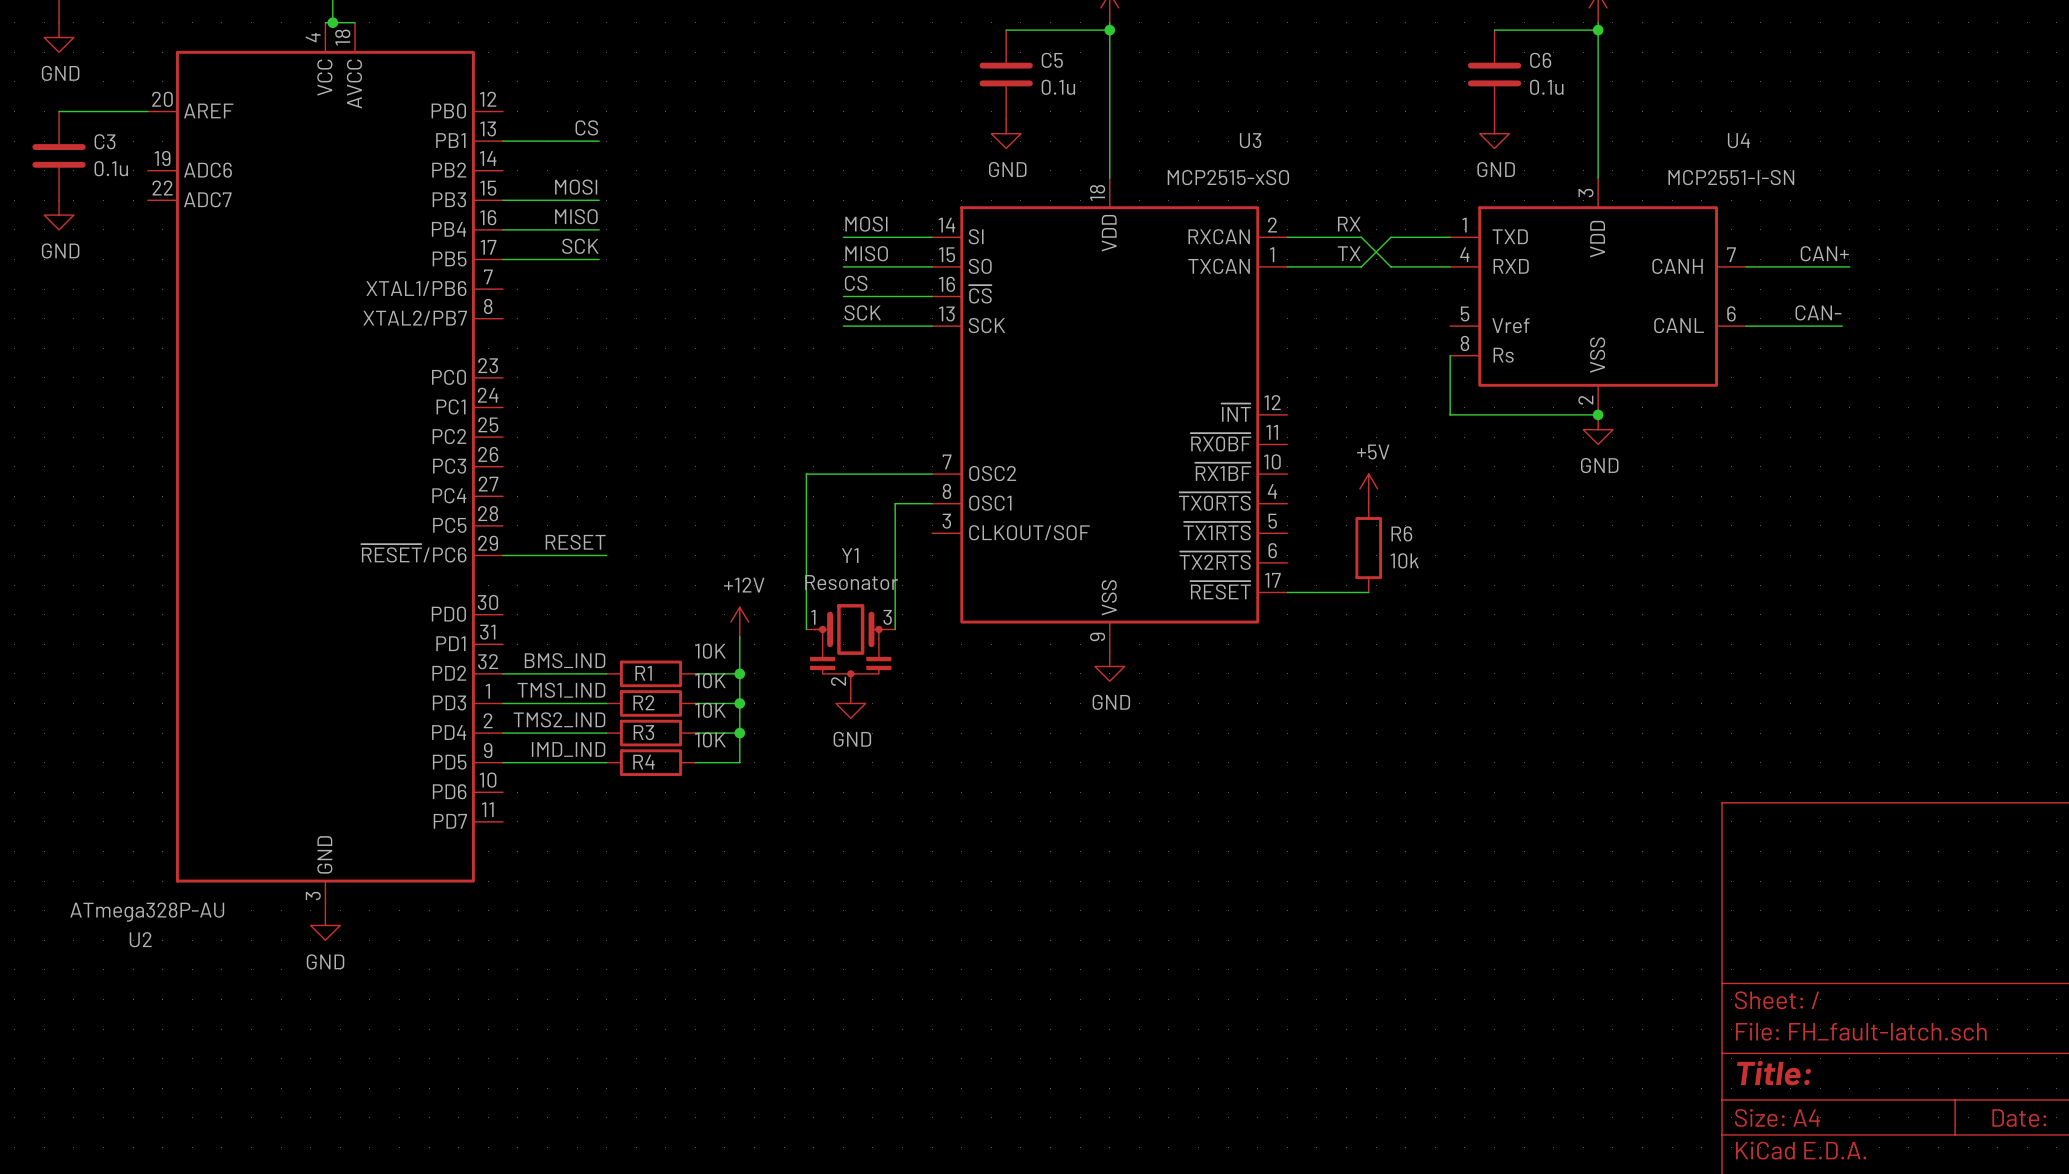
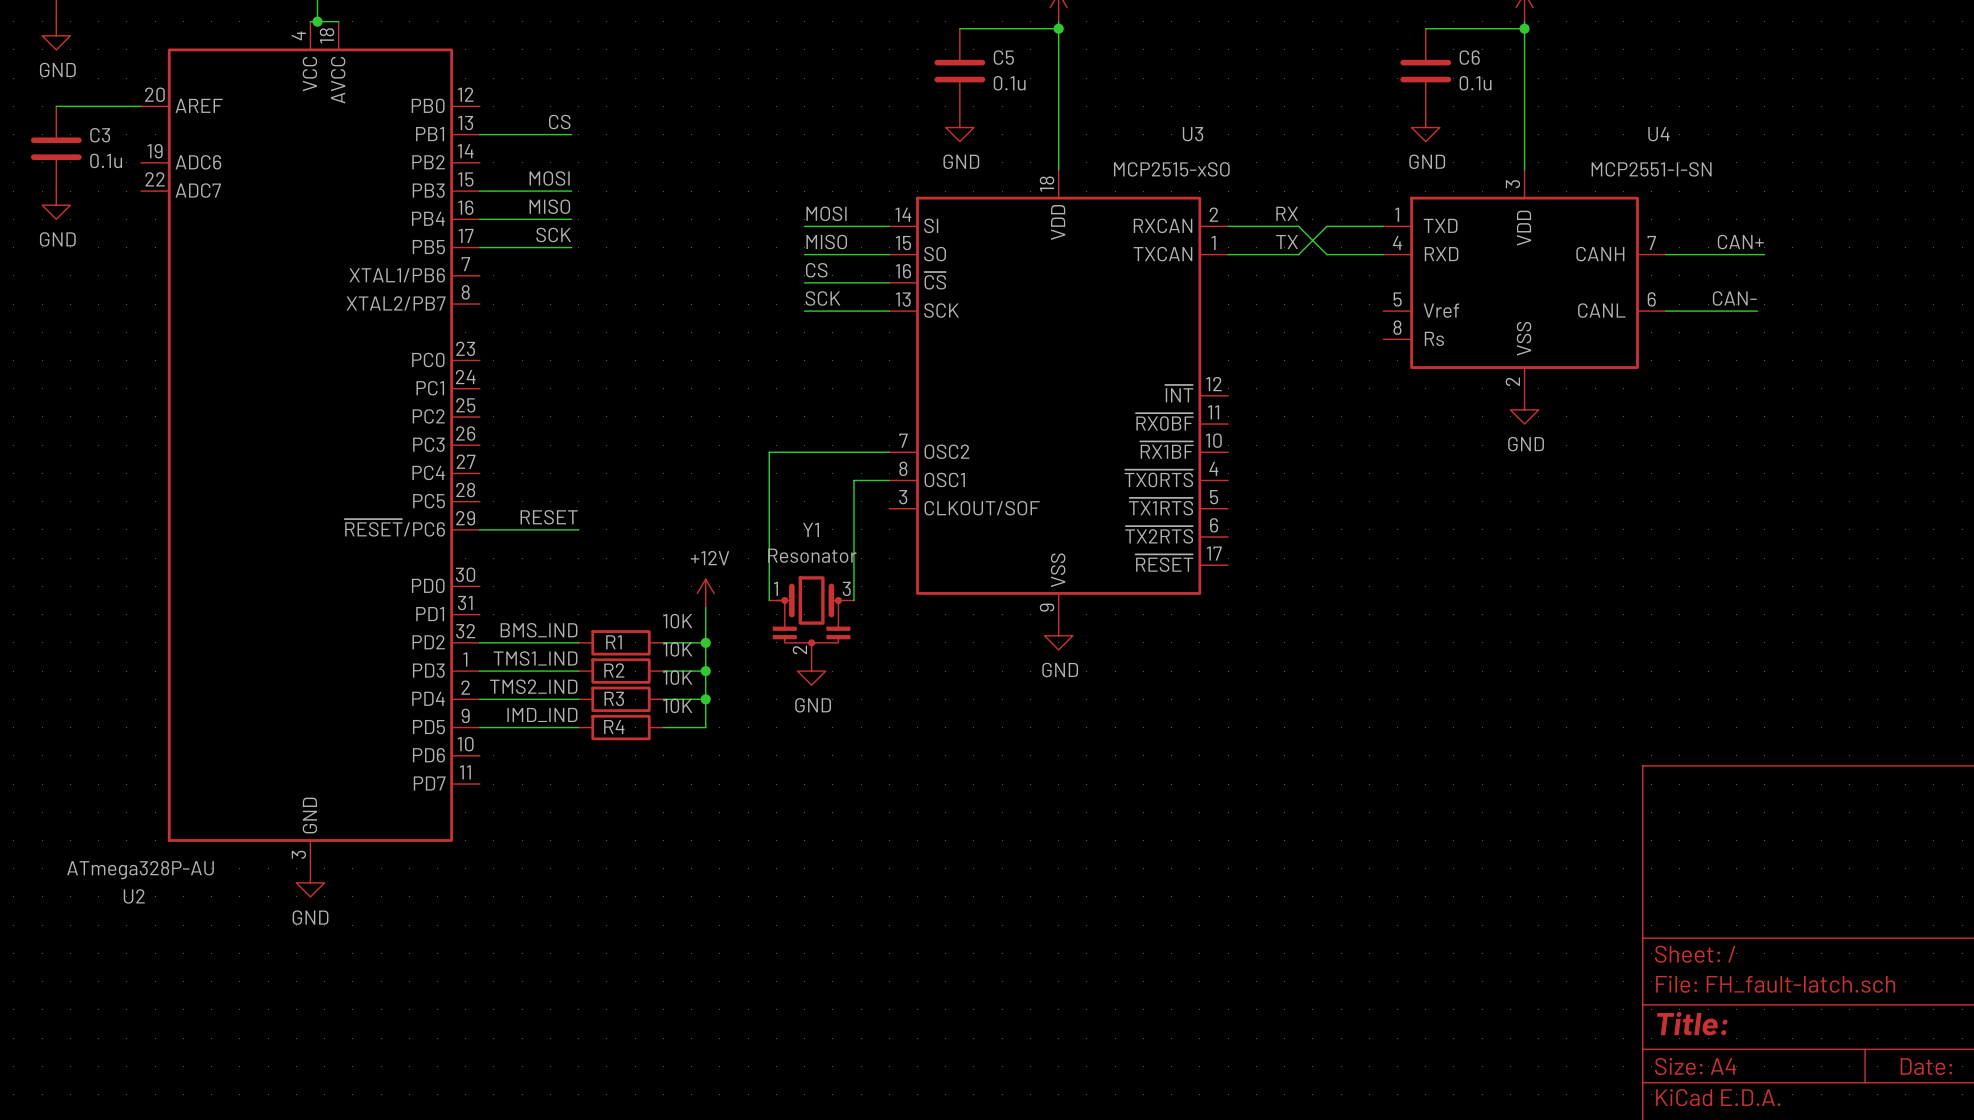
wire: (1450, 355) (1450, 414) (1598, 414) -> none
junction: (1598, 414) -> none
power symbol: +5V (1368, 488) -> none
R6: 10k (1368, 548) -> none
wire: (1287, 592) (1368, 592) -> none

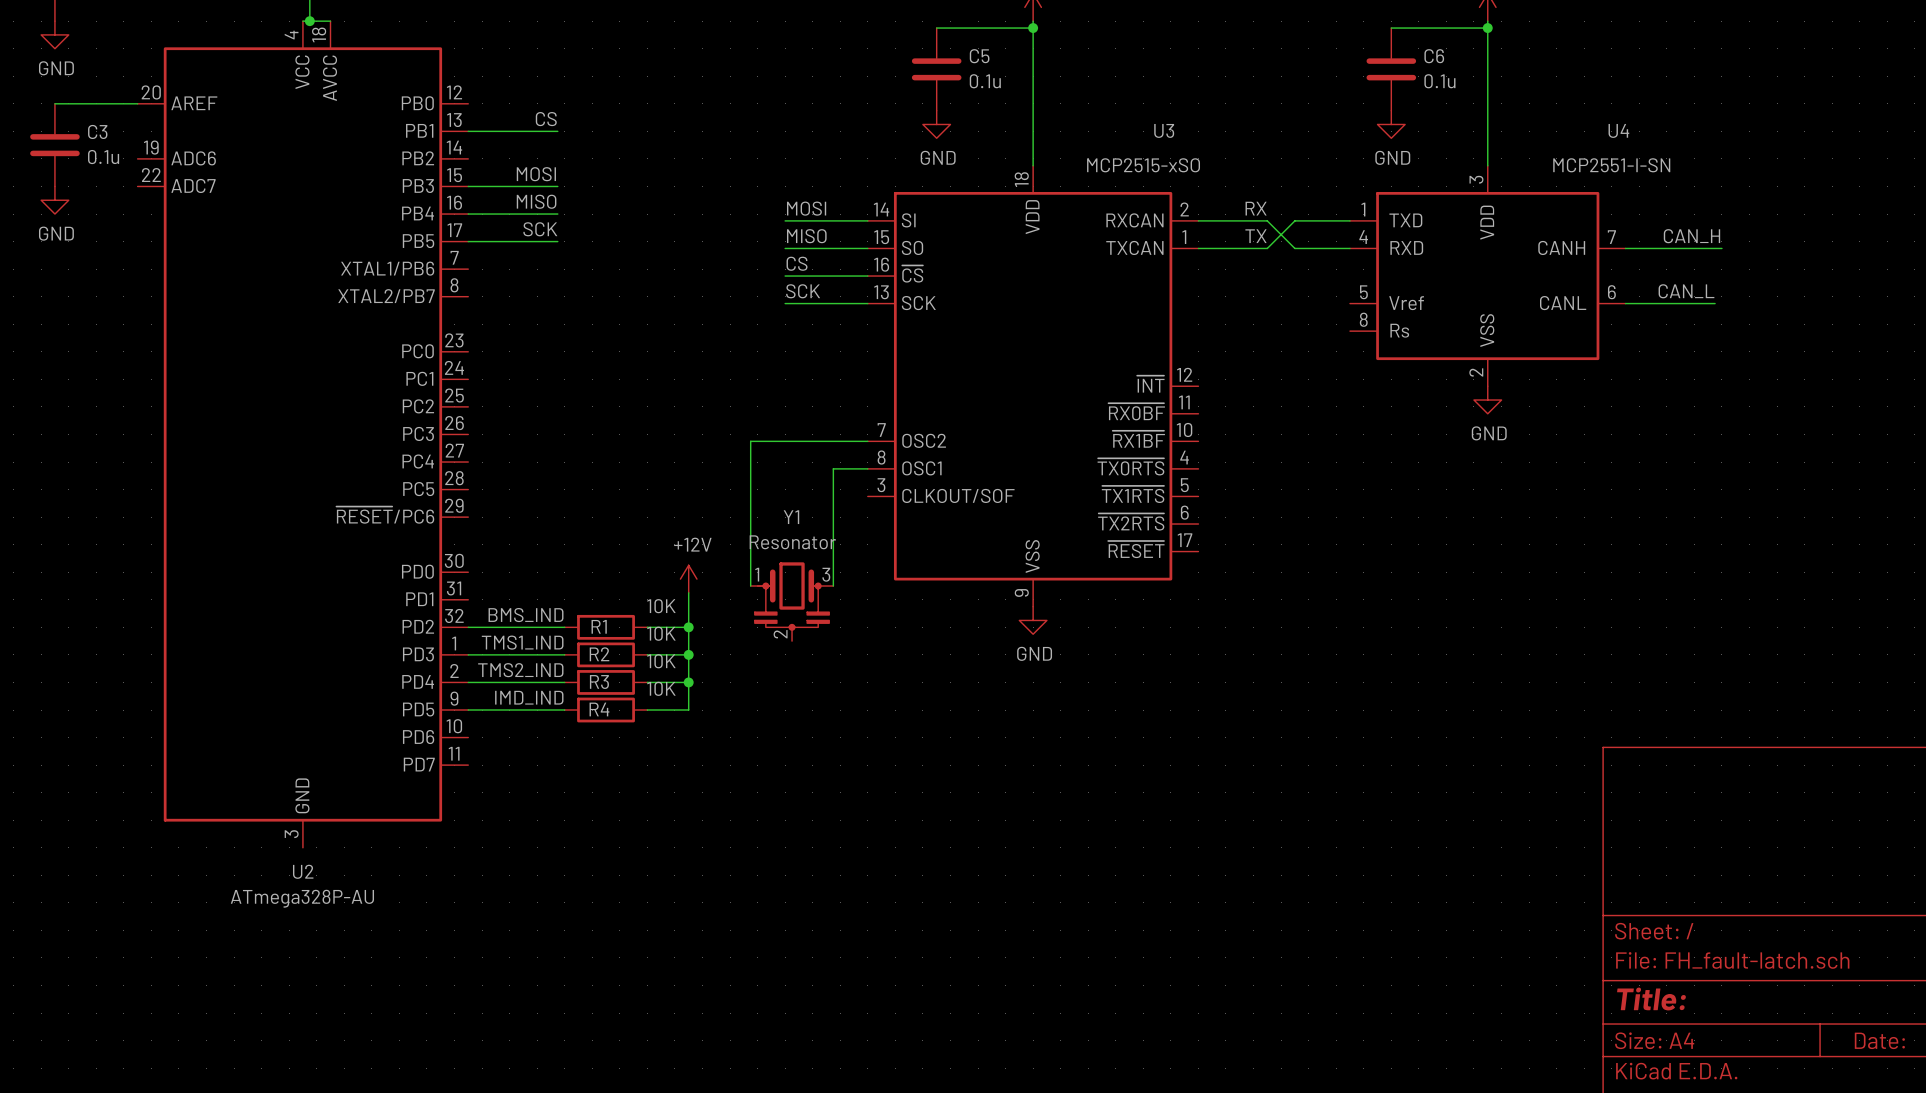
label: CAN+ (1740, 242) -> CAN_H (1691, 236)
label: CAN- (1734, 298) -> CAN_L (1686, 291)
label: RESET (549, 517) -> none
wire: (479, 529) (578, 529) -> none
power symbol: GND (811, 671) -> none
U2 value position: ATmega328P-AU (140, 870) -> ATmega328P-AU (302, 898)
power symbol: GND (310, 882) -> none
U2 name position: U2 (134, 896) -> U2 (303, 871)

